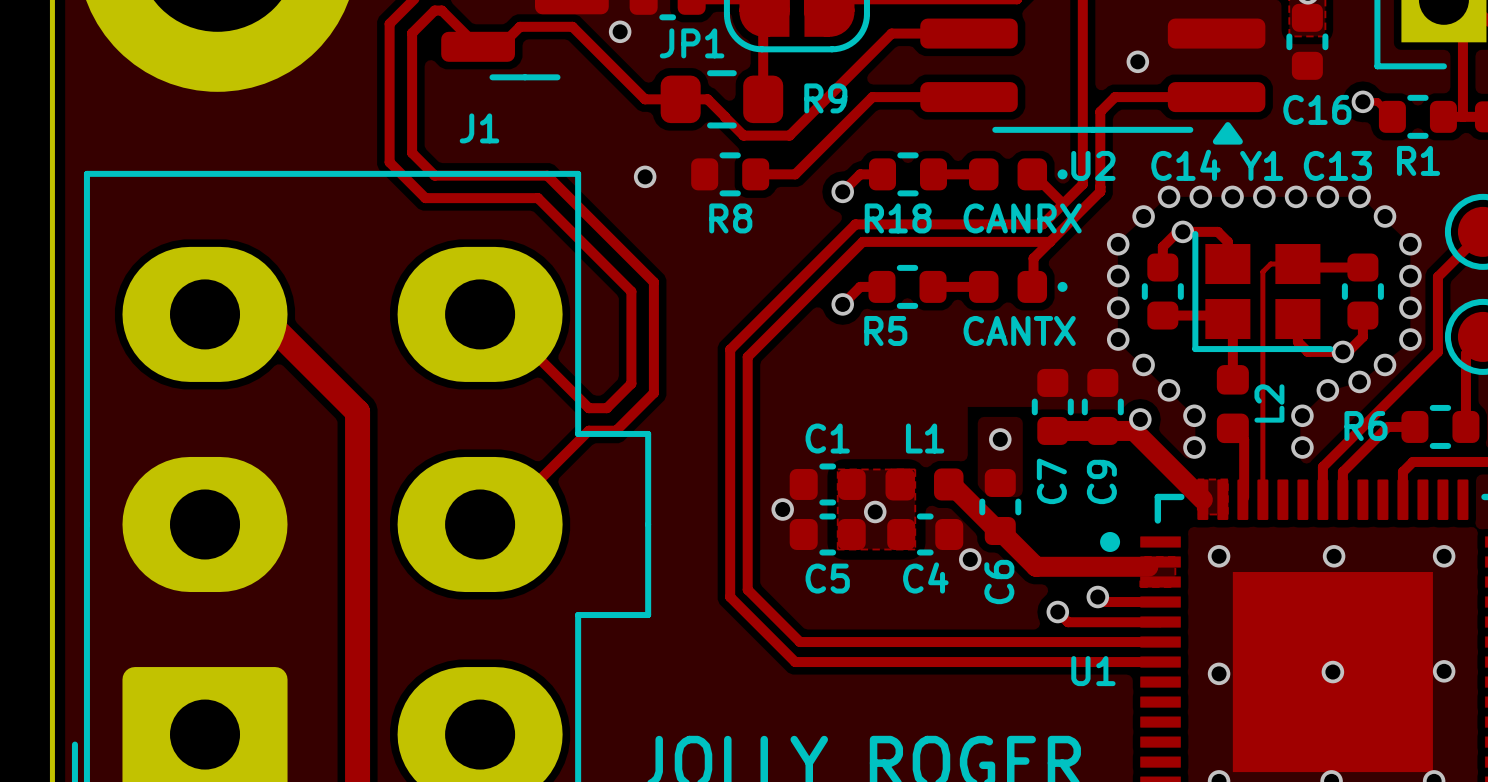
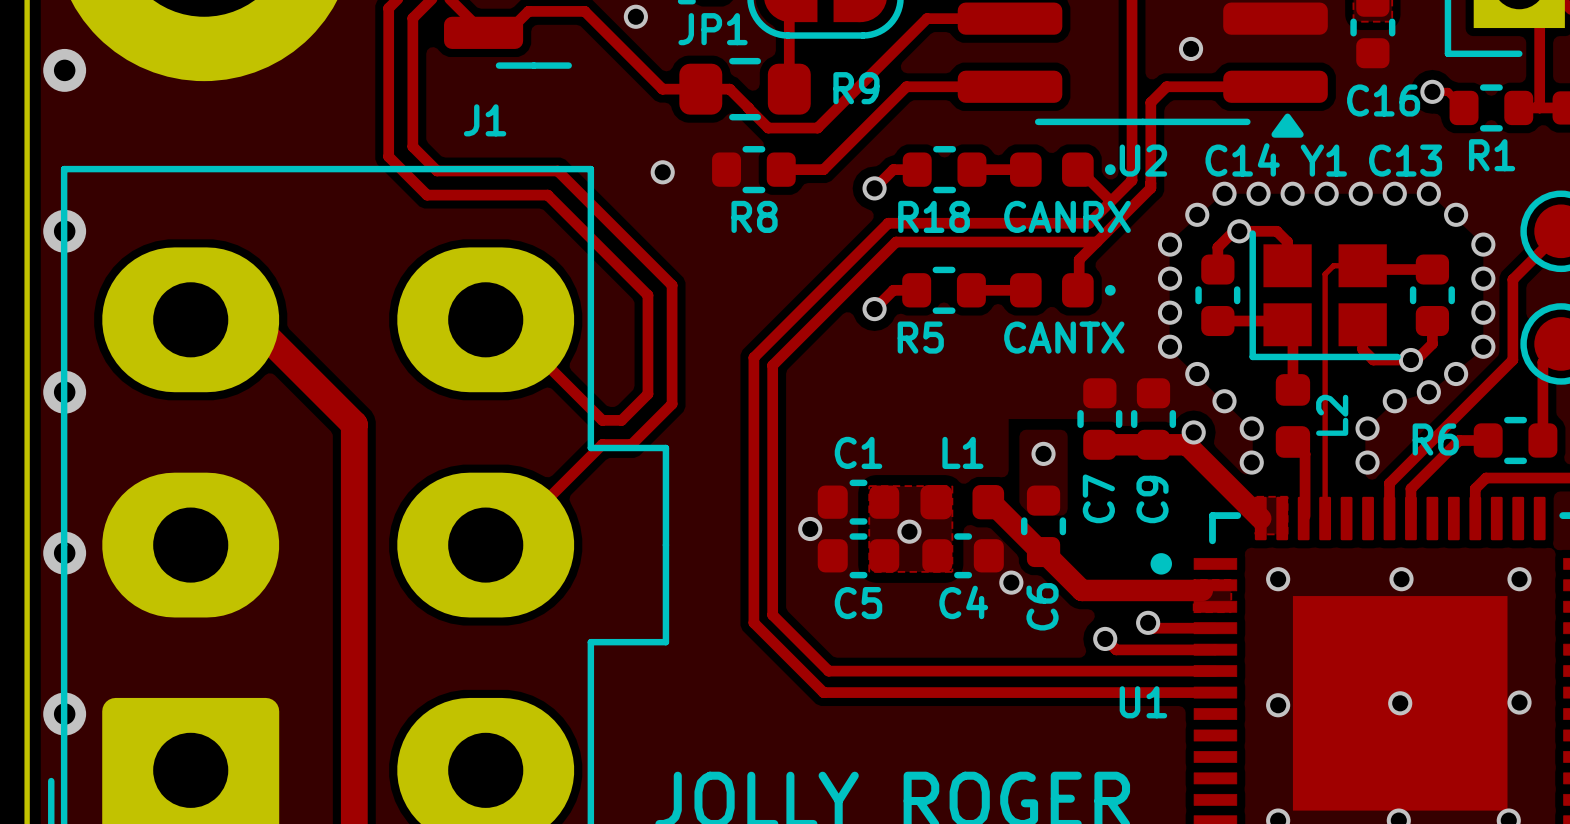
via: none -> (64, 70)
via: none -> (64, 231)
via: none -> (64, 392)
via: none -> (64, 553)
via: none -> (64, 714)

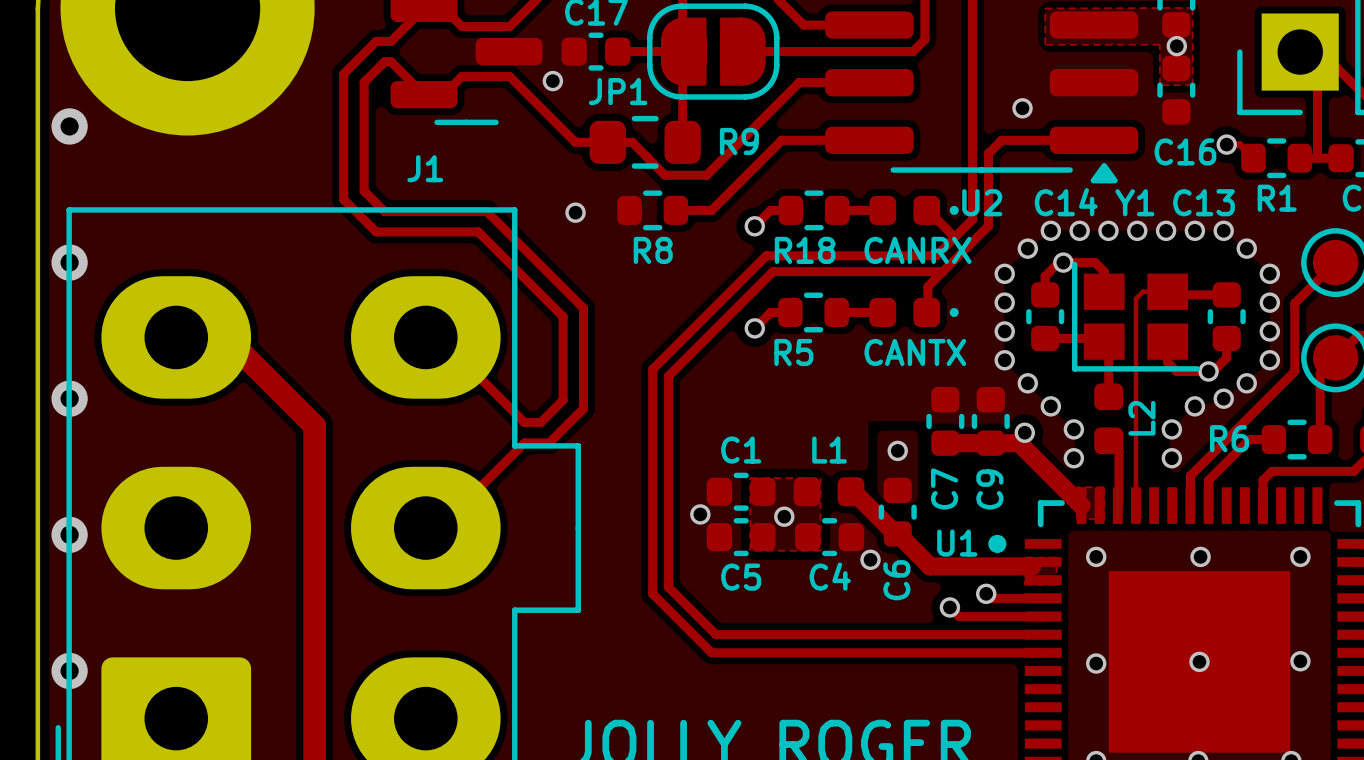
U1 name position: U1 (1143, 702) -> U1 (957, 543)

